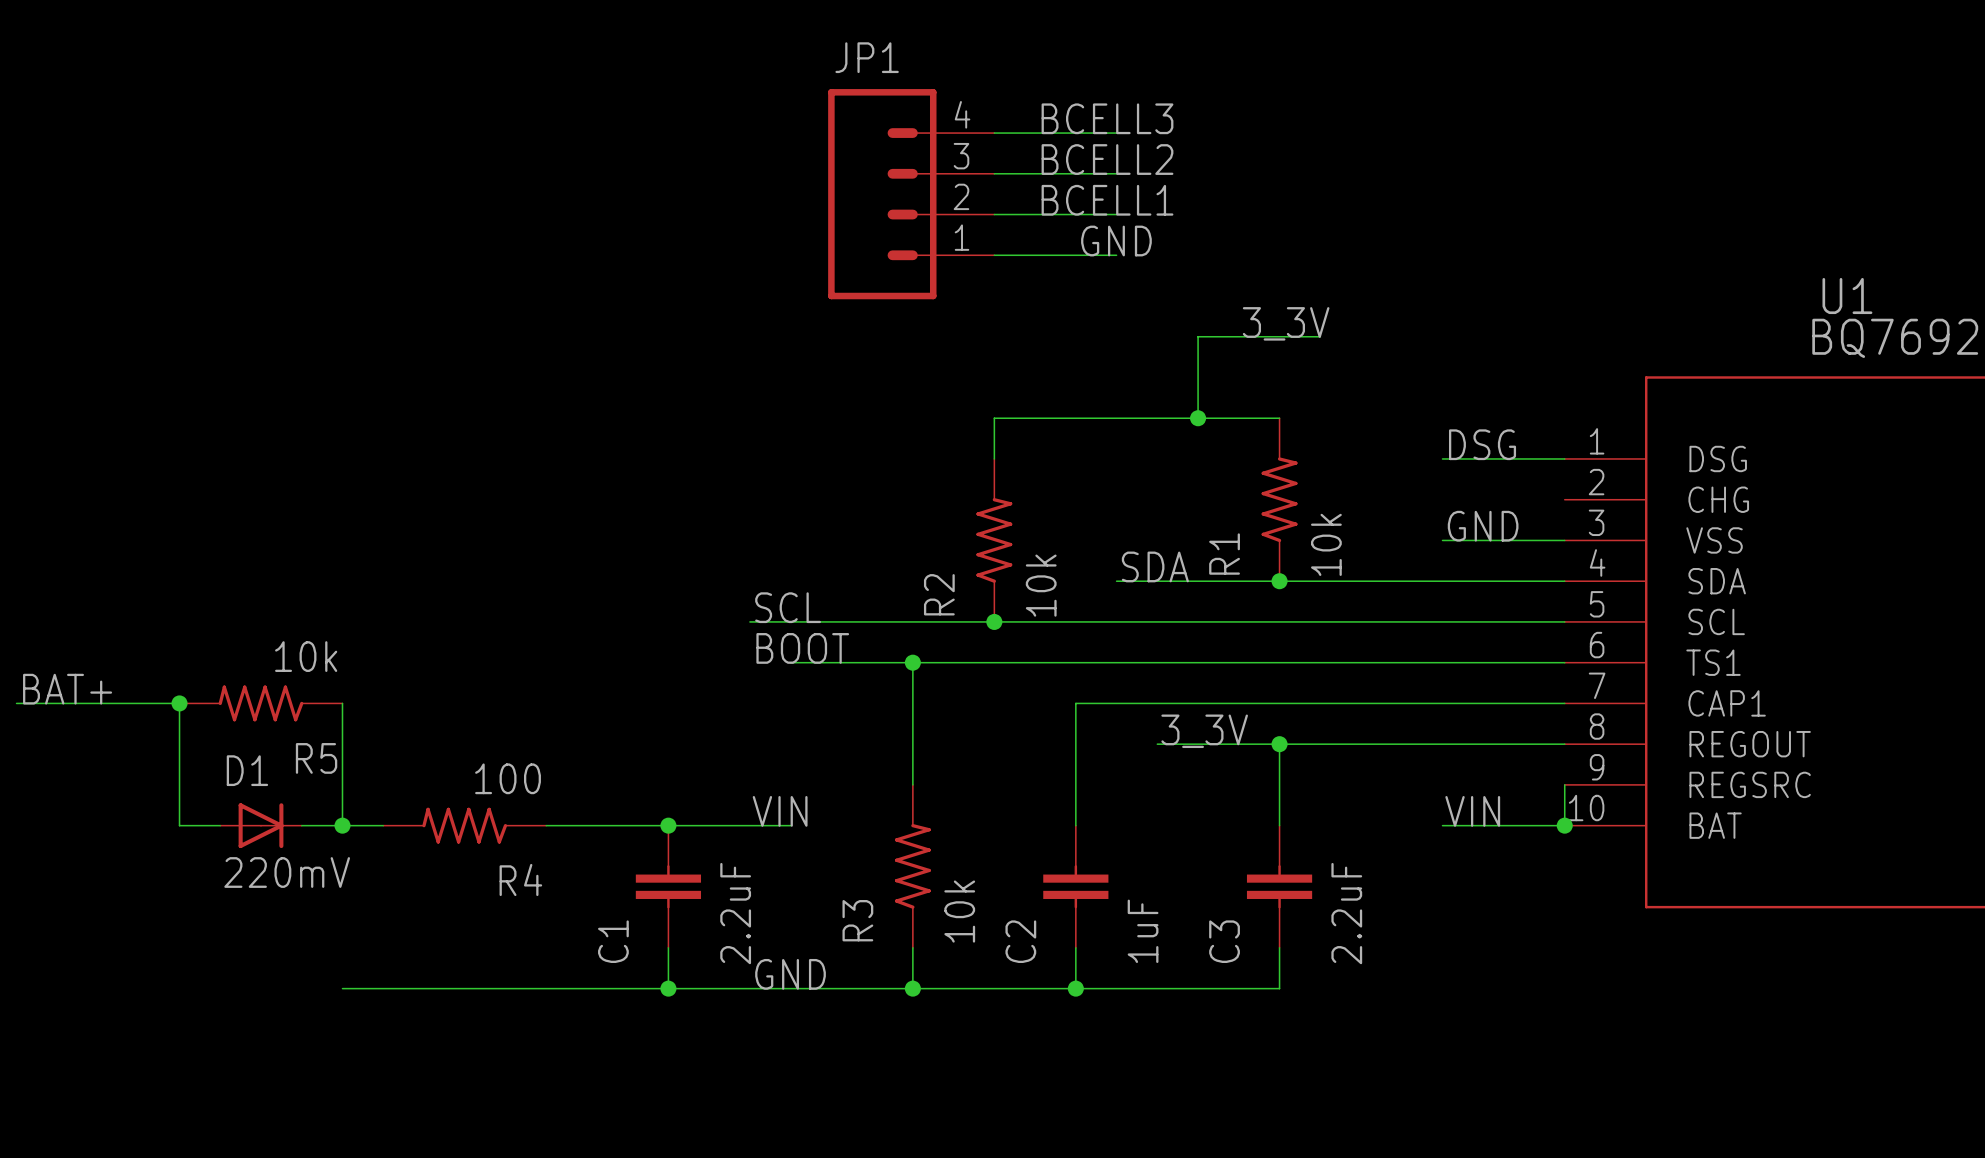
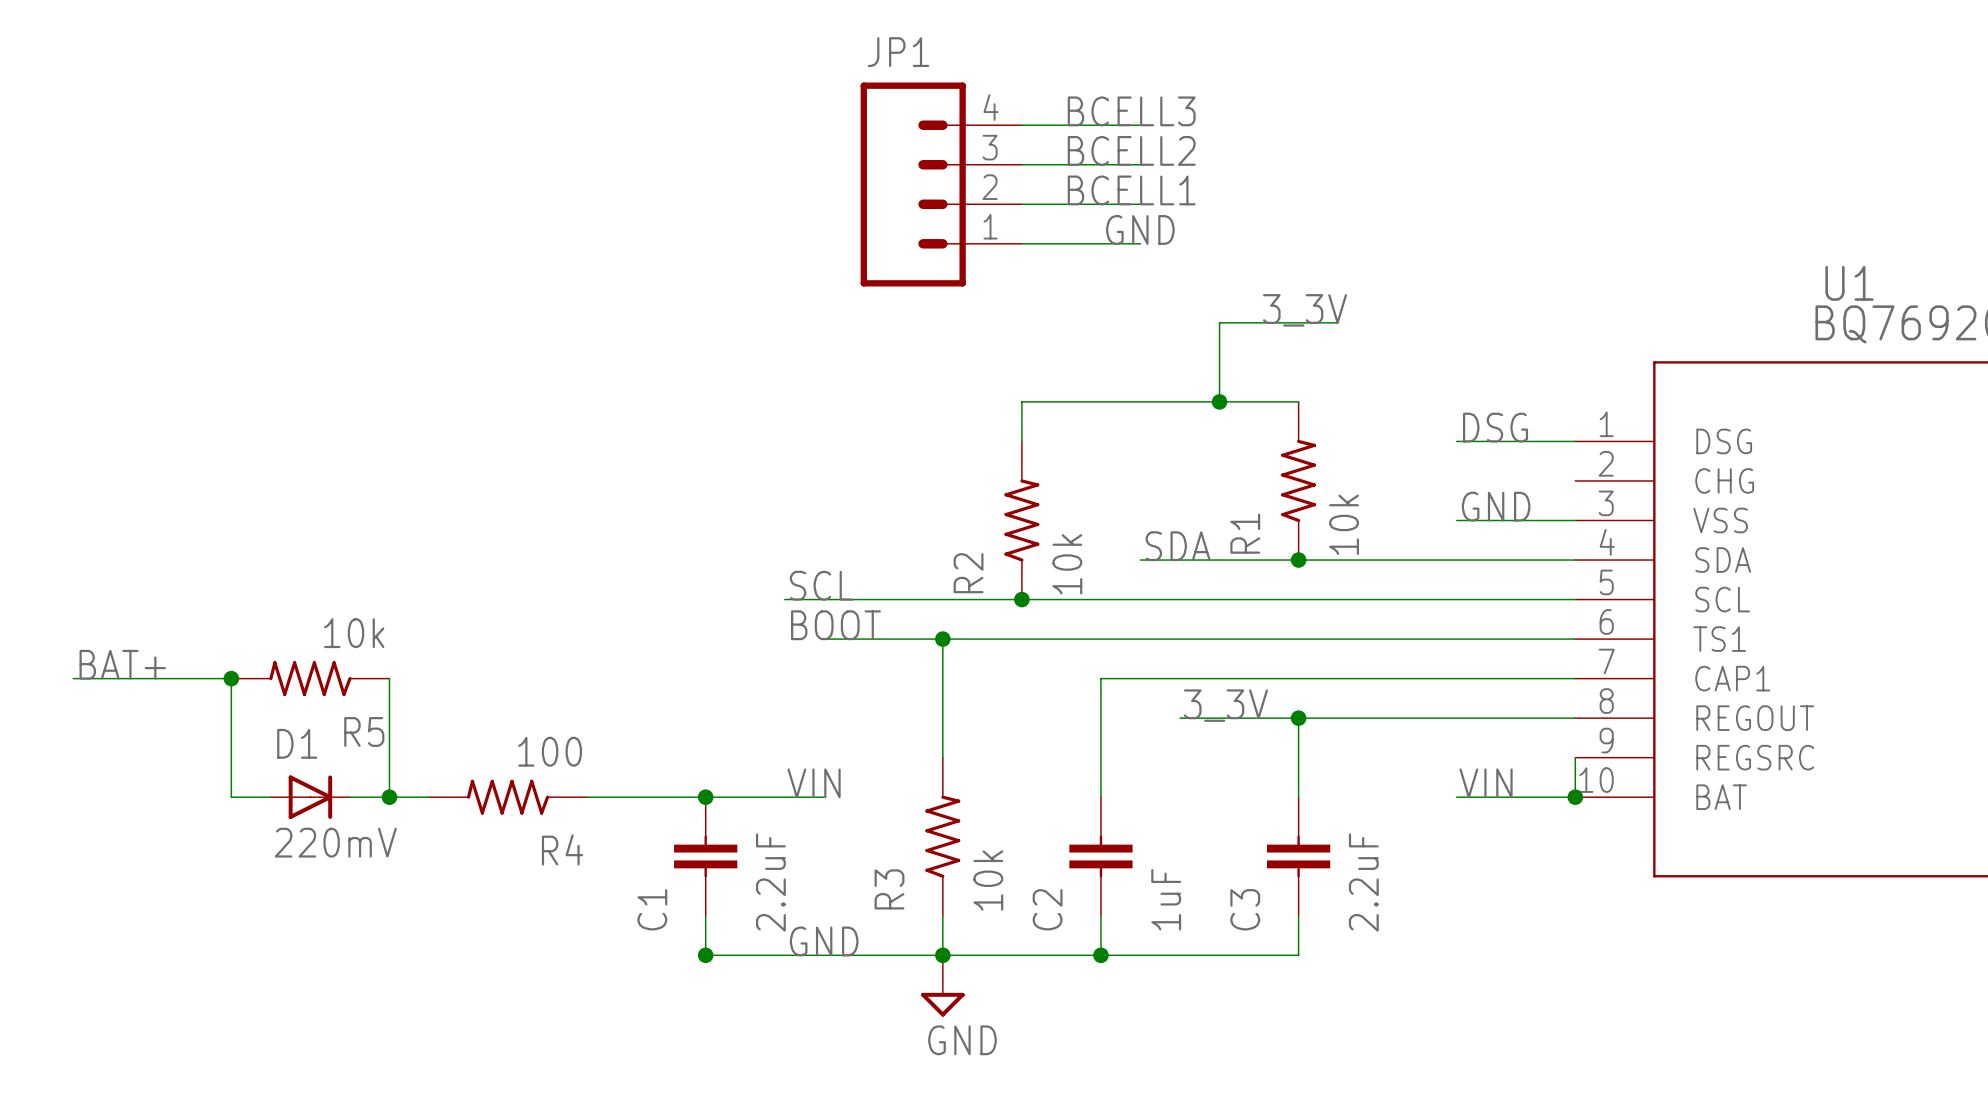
wire: (342, 988) (668, 988) -> none
power symbol: none -> GND (942, 985)

